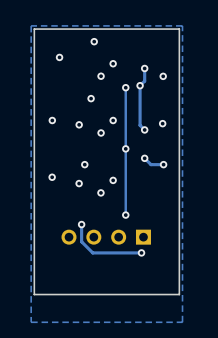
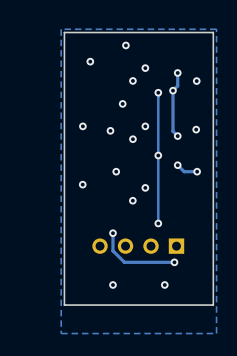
via: (79, 183) -> none
via: none -> (112, 284)
via: none -> (164, 284)

